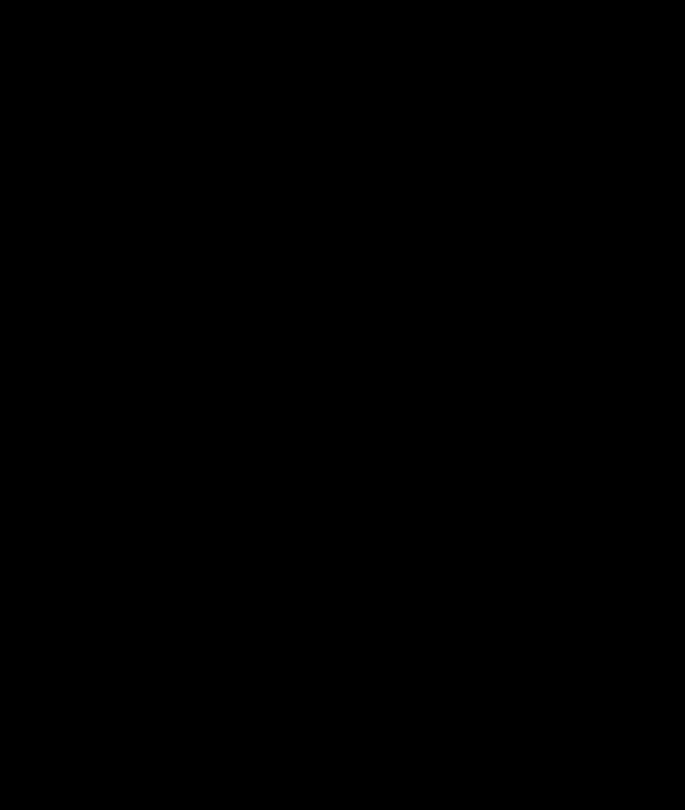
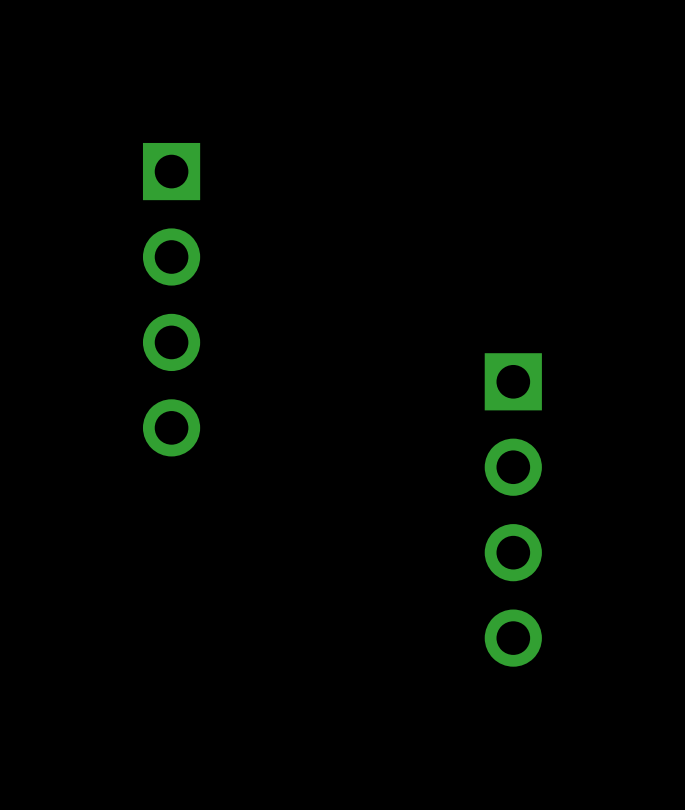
part: none -> (171, 299)
part: none -> (513, 509)

